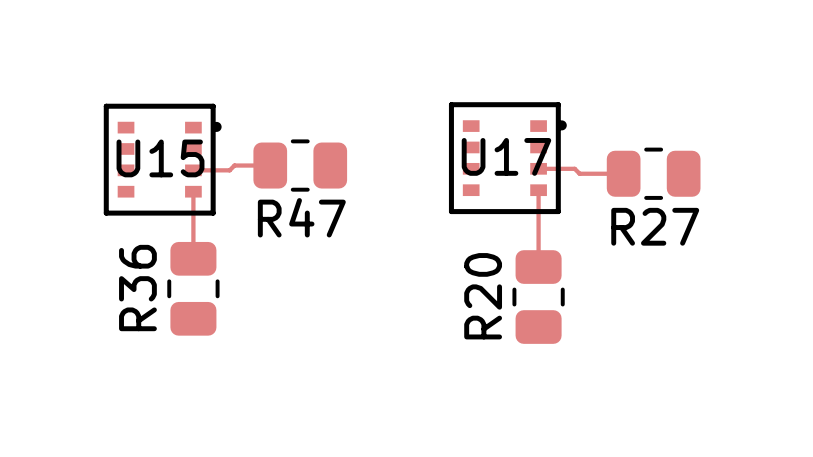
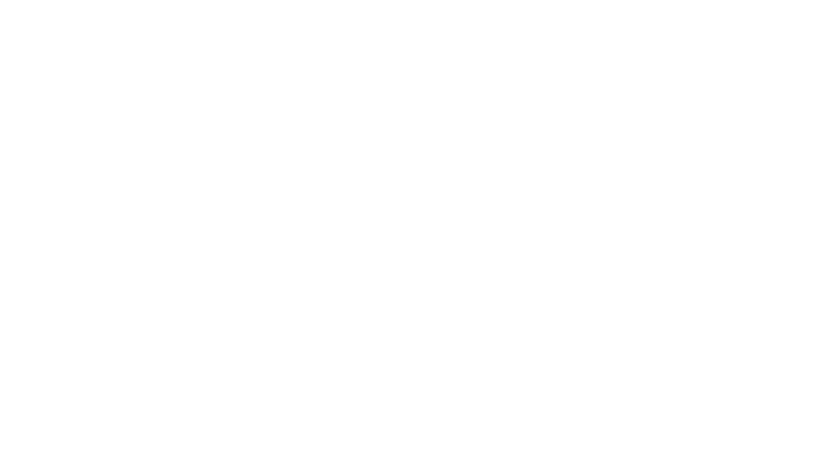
U17: (507, 158) -> none
U15: (162, 159) -> none
track: (270, 165) (234, 165) (229, 170) (193, 170) -> none
R47: (300, 165) -> none
track: (538, 168) (574, 168) (579, 173) (623, 173) -> none
R27: (653, 173) -> none
track: (538, 190) (538, 267) -> none
track: (193, 191) (193, 258) -> none
R36: (193, 288) -> none
R20: (538, 297) -> none

